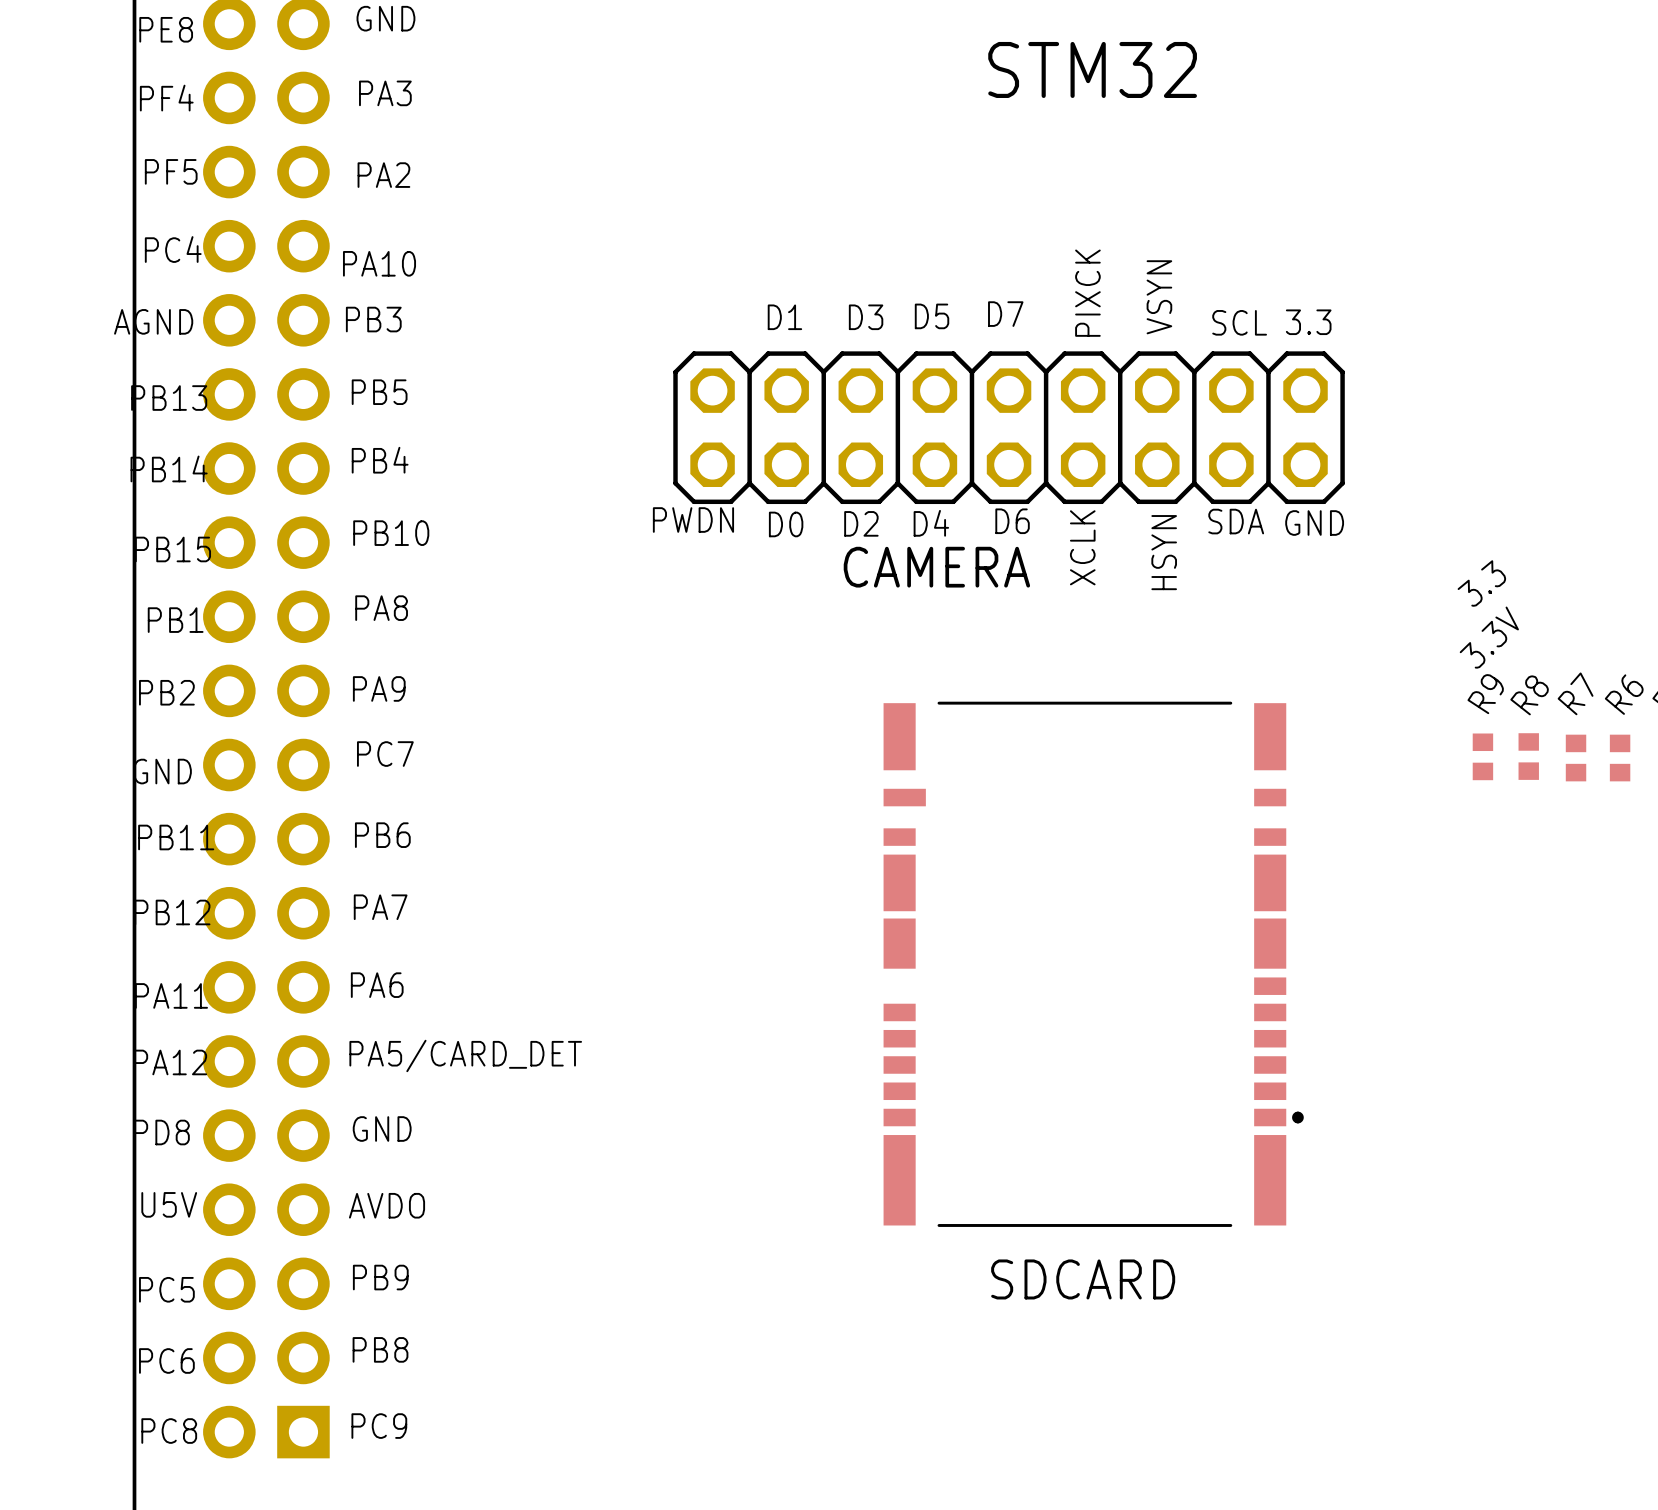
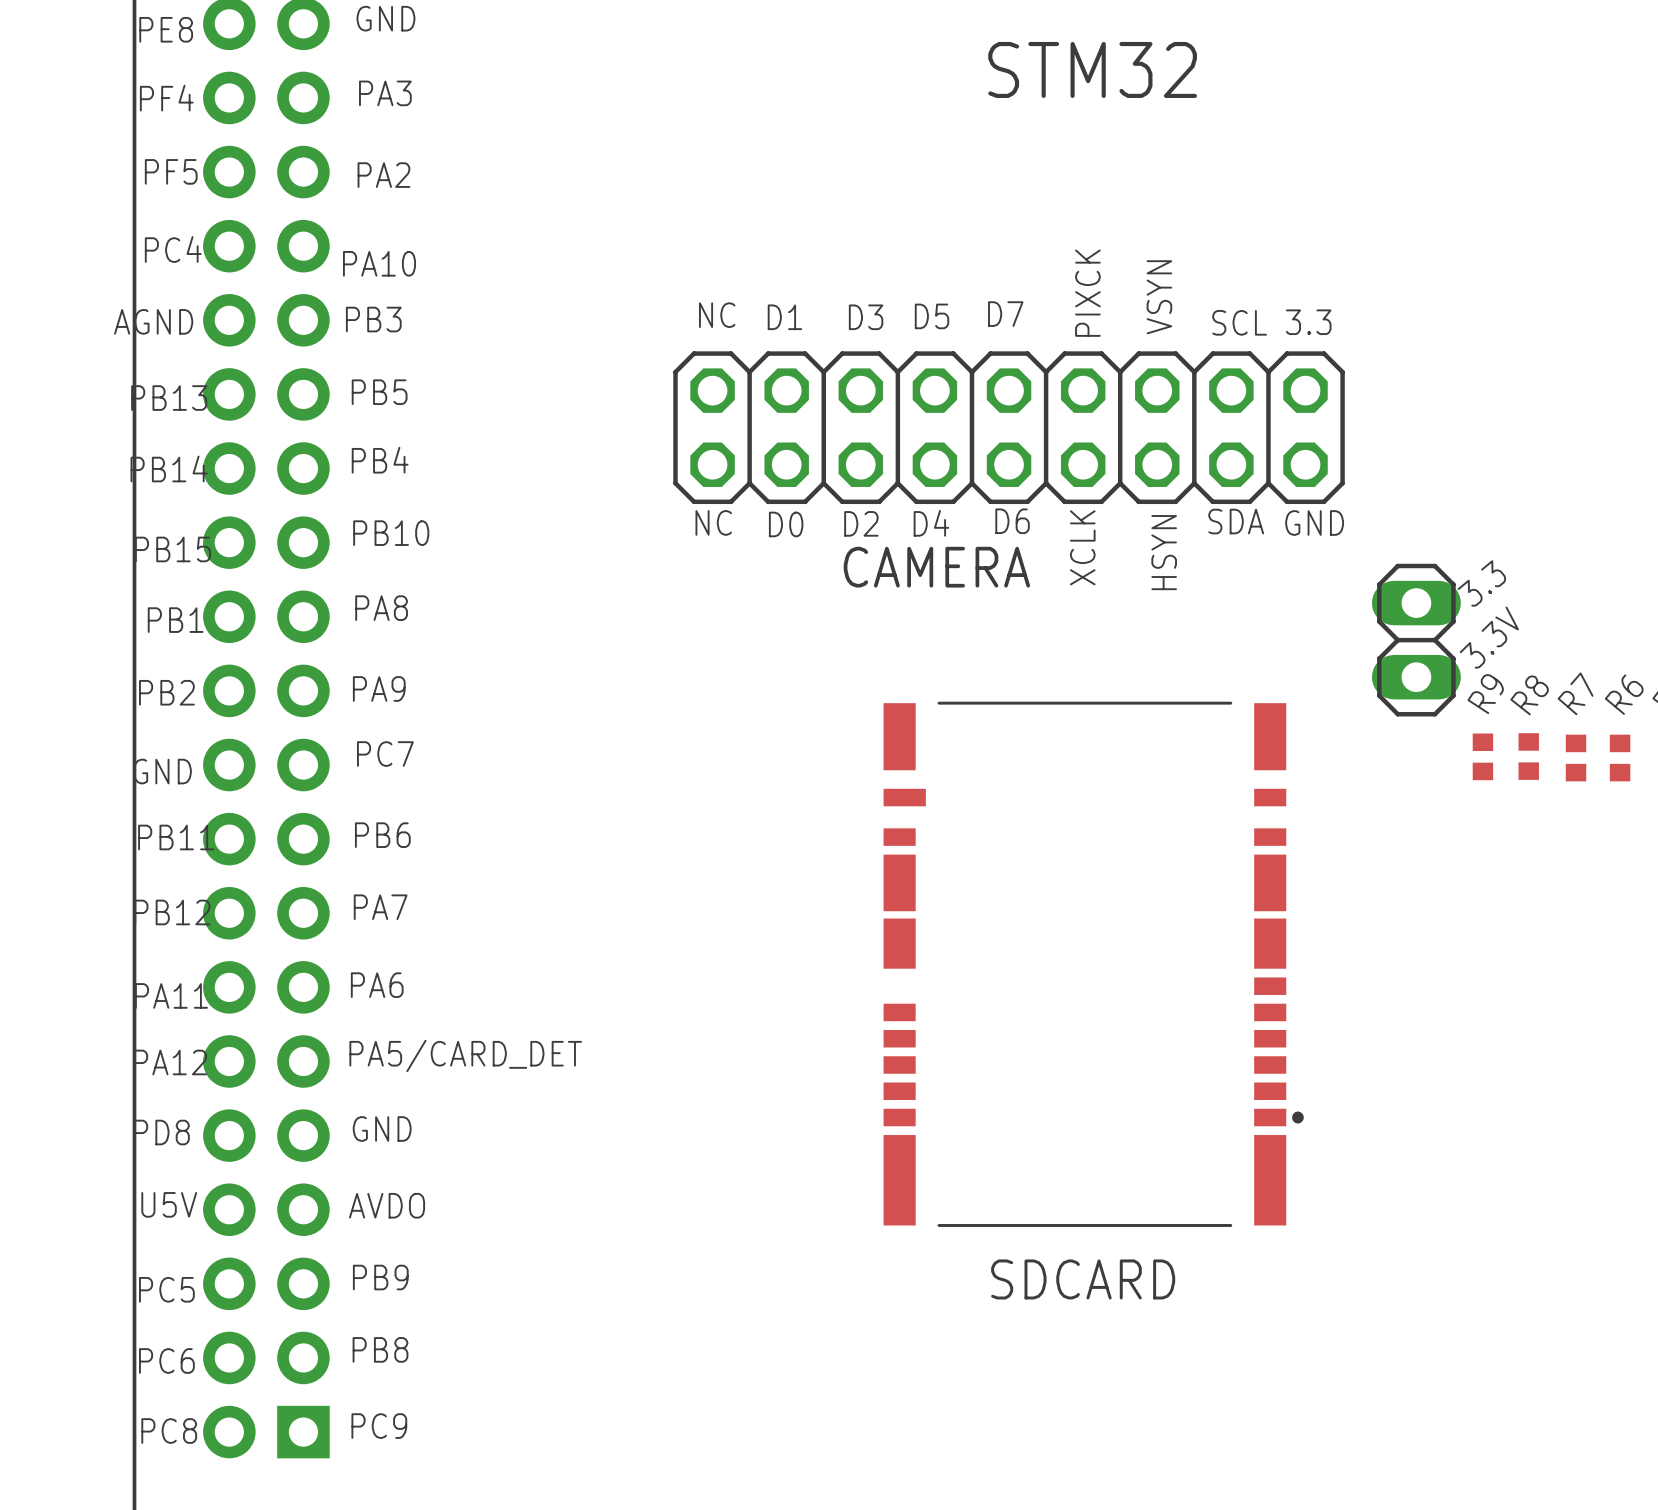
text: none -> NC (717, 315)
text: PWDN (693, 520) -> none
text: none -> NC (713, 522)
part: none -> (1416, 640)

